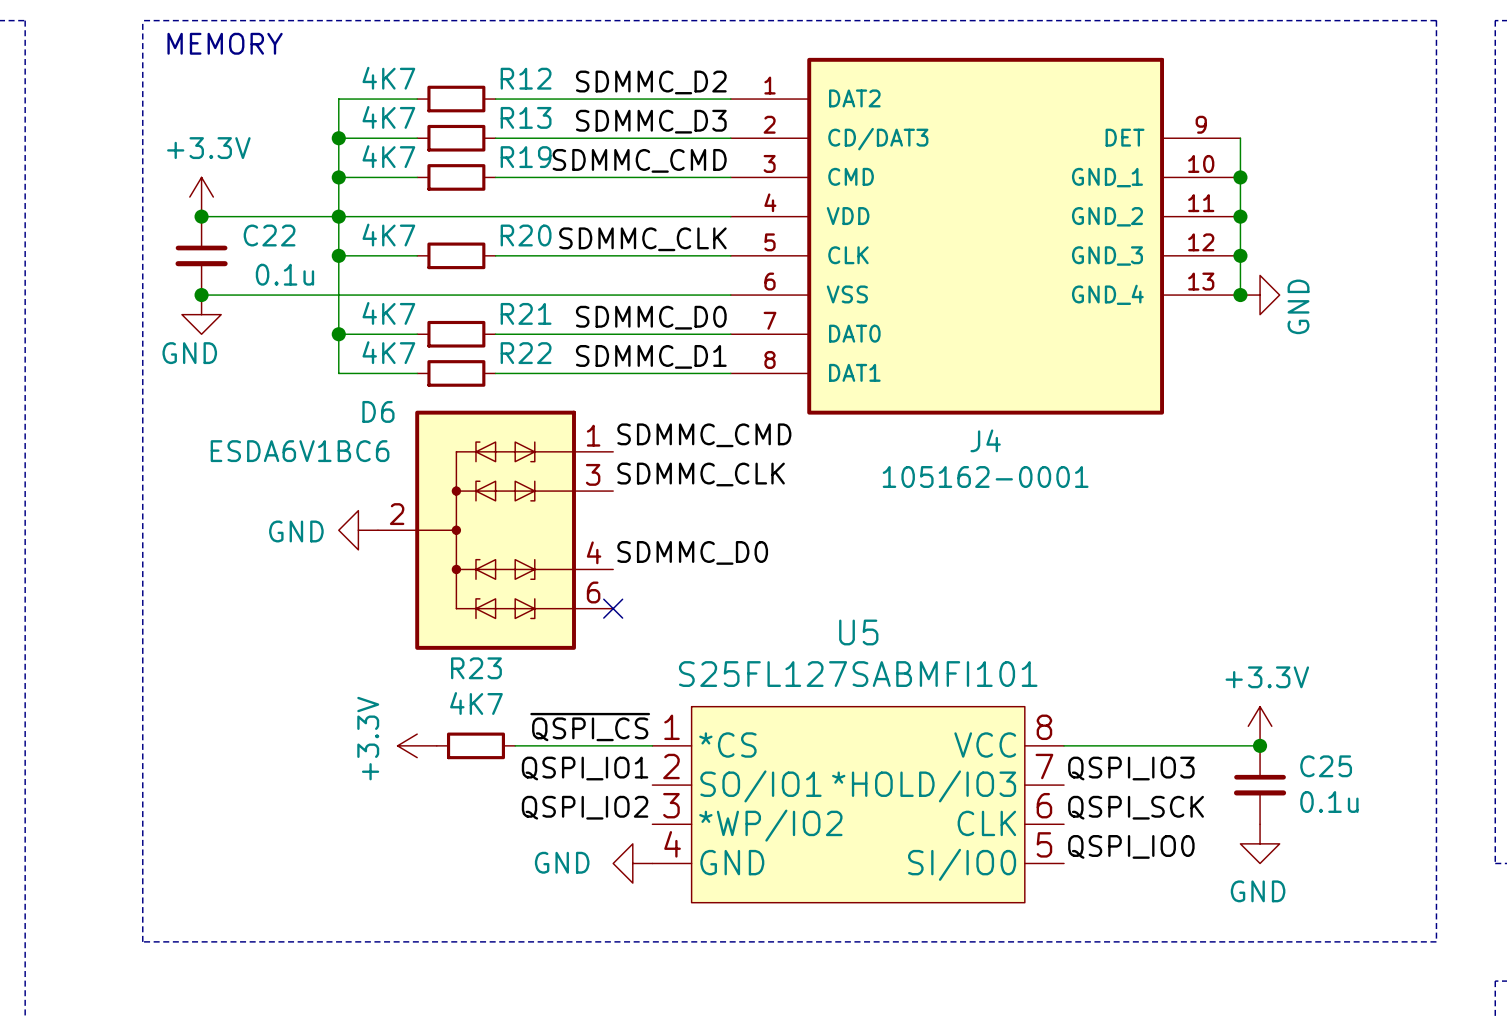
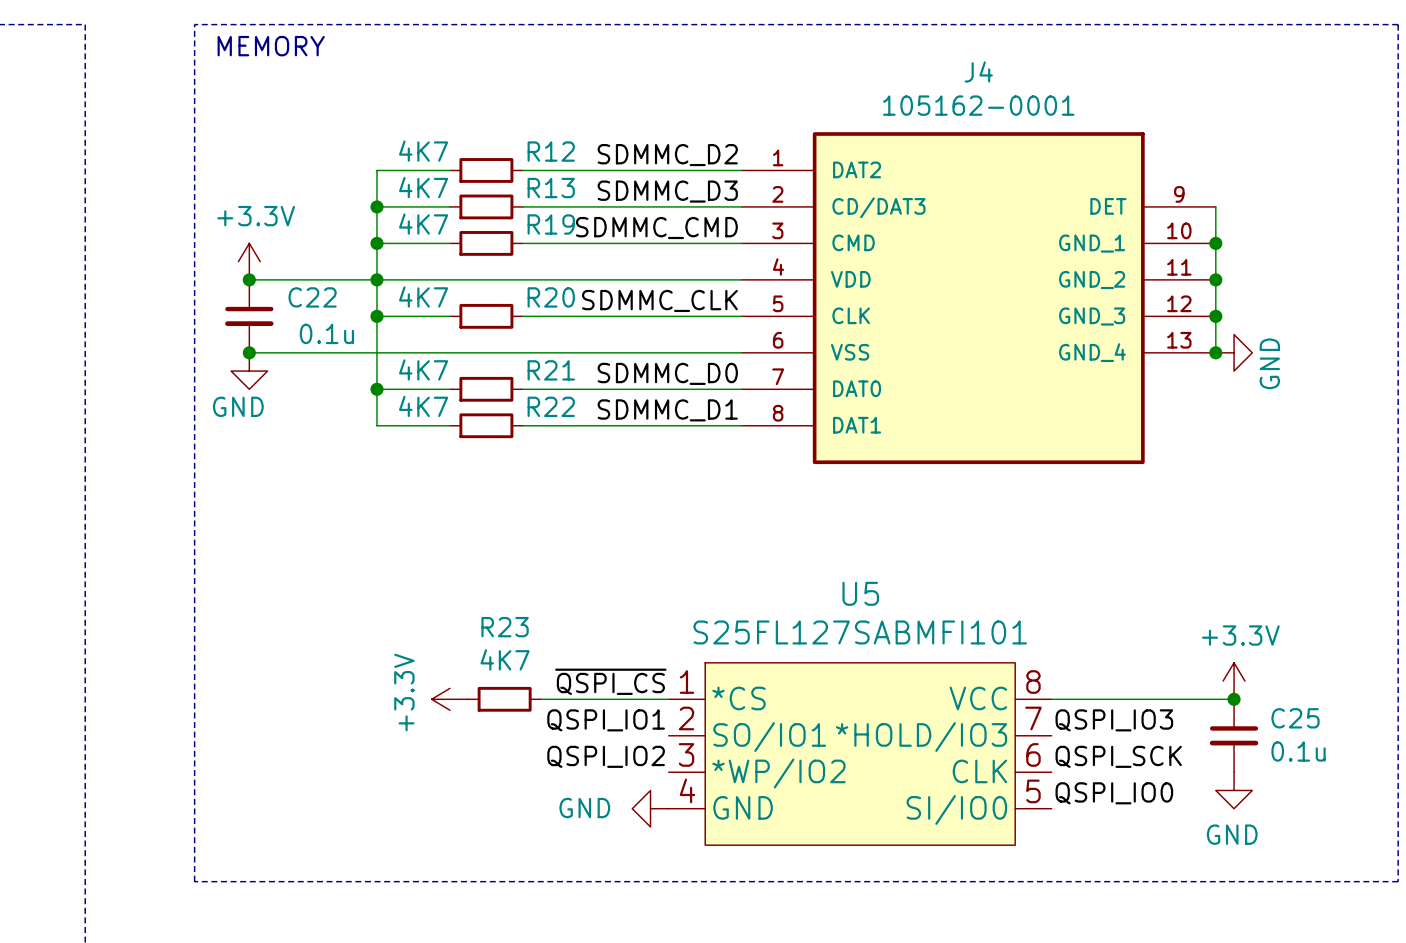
label: SDMMC_D2 (651, 82) -> none
wire: (417, 99) (338, 99) (338, 177) -> none
R12: 4K7 (456, 99) -> none
wire: (495, 99) (730, 99) -> (522, 425) (741, 425)
label position: SDMMC_D3 (651, 121) -> SDMMC_D3 (667, 191)
wire: (338, 138) (417, 138) -> (376, 389) (449, 389)
junction: (338, 138) -> none
R13 position: (456, 138) -> (486, 206)
wire: (495, 138) (730, 138) -> (522, 389) (741, 389)
wire: (1240, 138) (1240, 216) -> (1215, 279) (1215, 352)
R19 name: R19 (526, 157) -> R12 (551, 151)
label: SDMMC_CMD (639, 160) -> SDMMC_D2 (667, 155)
junction: (338, 177) -> none
junction: (1240, 177) -> none
power symbol position: +3.3V (201, 197) -> +3.3V (249, 261)
wire: (201, 216) (338, 216) -> none
junction: (201, 216) -> none
wire: (417, 216) (495, 216) -> (449, 352) (522, 352)
junction: (1240, 216) -> none
R20 name: R20 (526, 235) -> R19 (551, 224)
J4 position: (985, 236) -> (978, 298)
label: SDMMC_CLK (642, 239) -> SDMMC_CMD (656, 228)
C22 position: (201, 255) -> (249, 316)
junction: none -> (376, 279)
power symbol position: GND (1260, 295) -> GND (1234, 352)
R21 name: R21 (526, 313) -> R20 (551, 297)
power symbol position: GND (201, 314) -> GND (249, 371)
label: SDMMC_D0 (651, 317) -> SDMMC_CLK (659, 300)
junction: none -> (1215, 316)
label position: SDMMC_D1 (651, 356) -> SDMMC_D1 (667, 410)
wire: none -> (249, 352) (376, 352) (376, 425) (449, 425)
junction: none -> (249, 352)
R22 position: (456, 373) -> (486, 425)
junction: none -> (1215, 352)
junction: none -> (376, 389)
R21: none -> 4K7 (486, 389)
label: SDMMC_CMD (704, 435) -> none
J4 name position: J4 (985, 440) -> J4 (978, 71)
label: SDMMC_CLK (701, 474) -> none
J4 value position: 105162-0001 (985, 476) -> 105162-0001 (978, 105)
power symbol: GND (358, 530) -> none
D6: ESDA6V1BC6 (495, 530) -> none
label position: SDMMC_D0 (692, 552) -> SDMMC_D0 (667, 373)
no-connect mark: (613, 608) -> none

